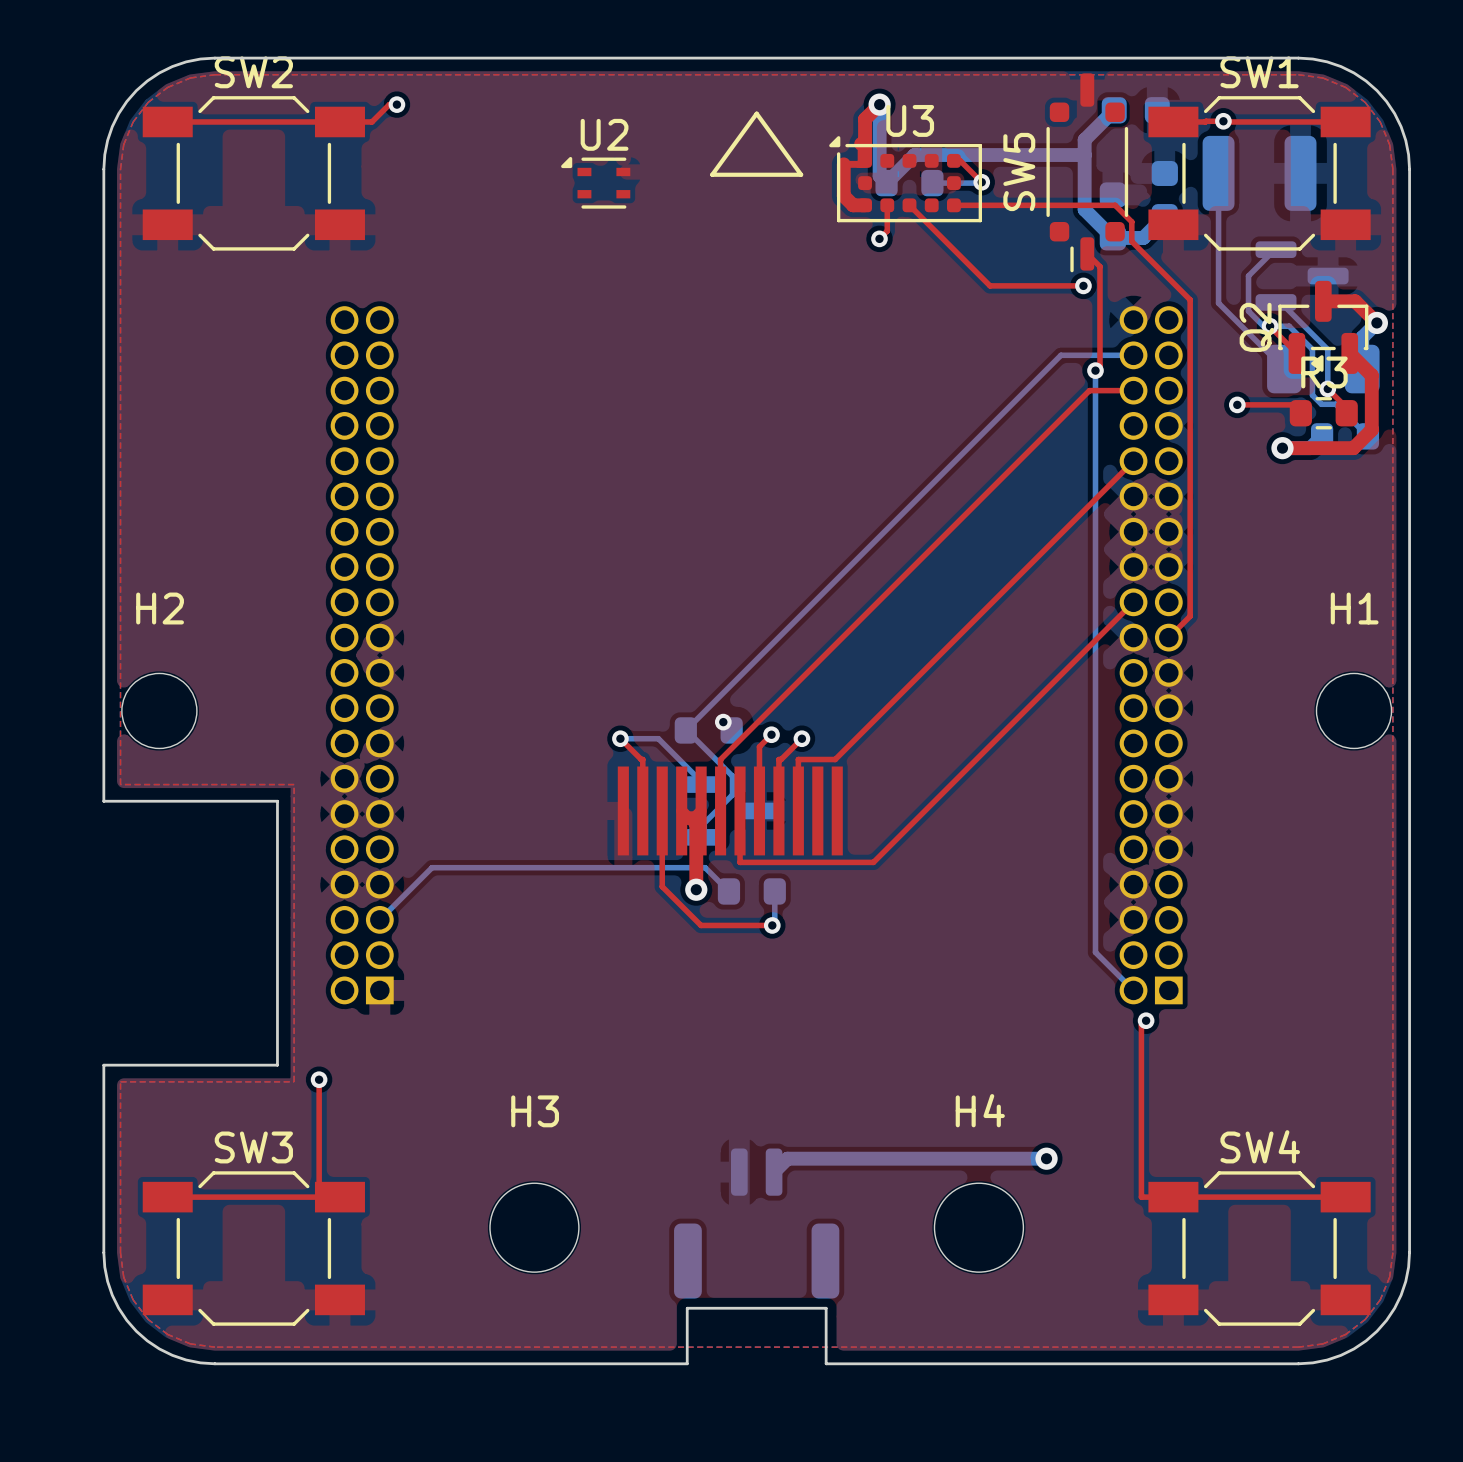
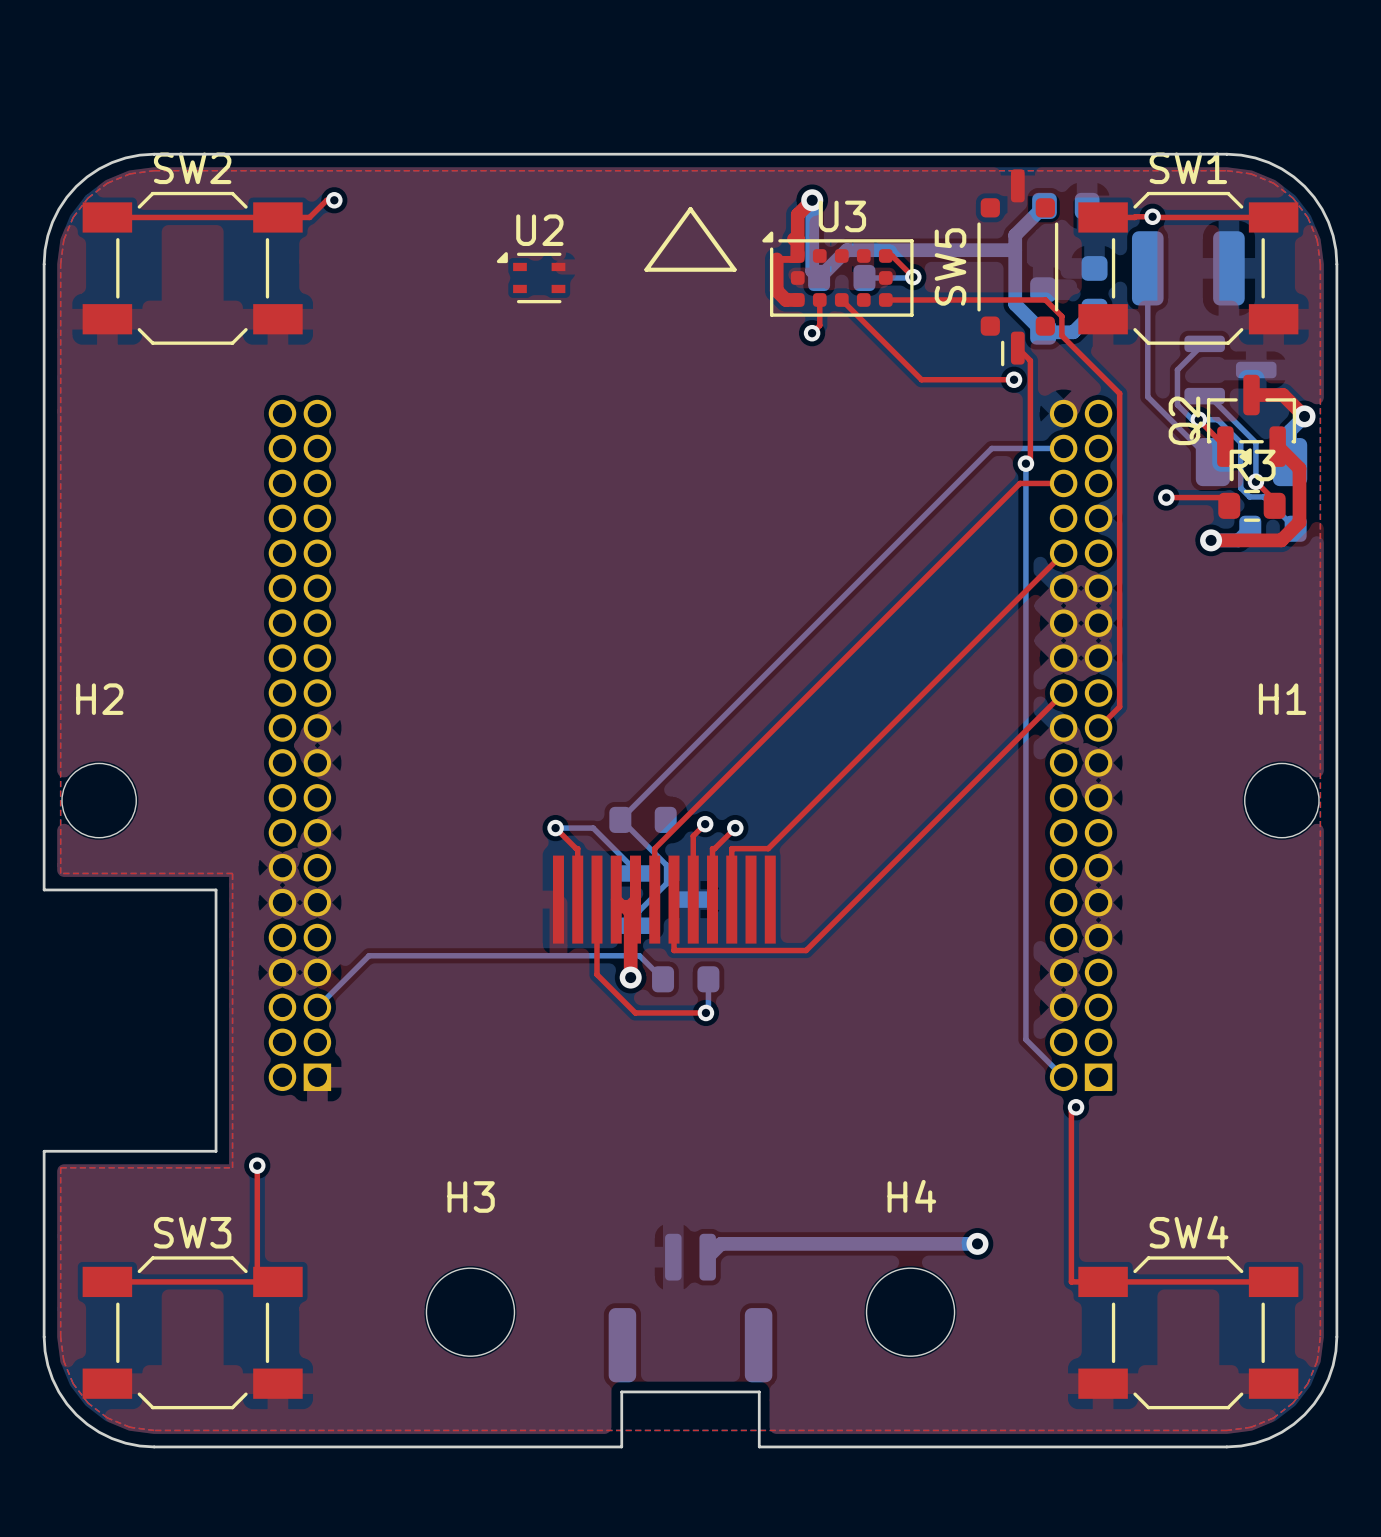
via: (723, 722) -> none

